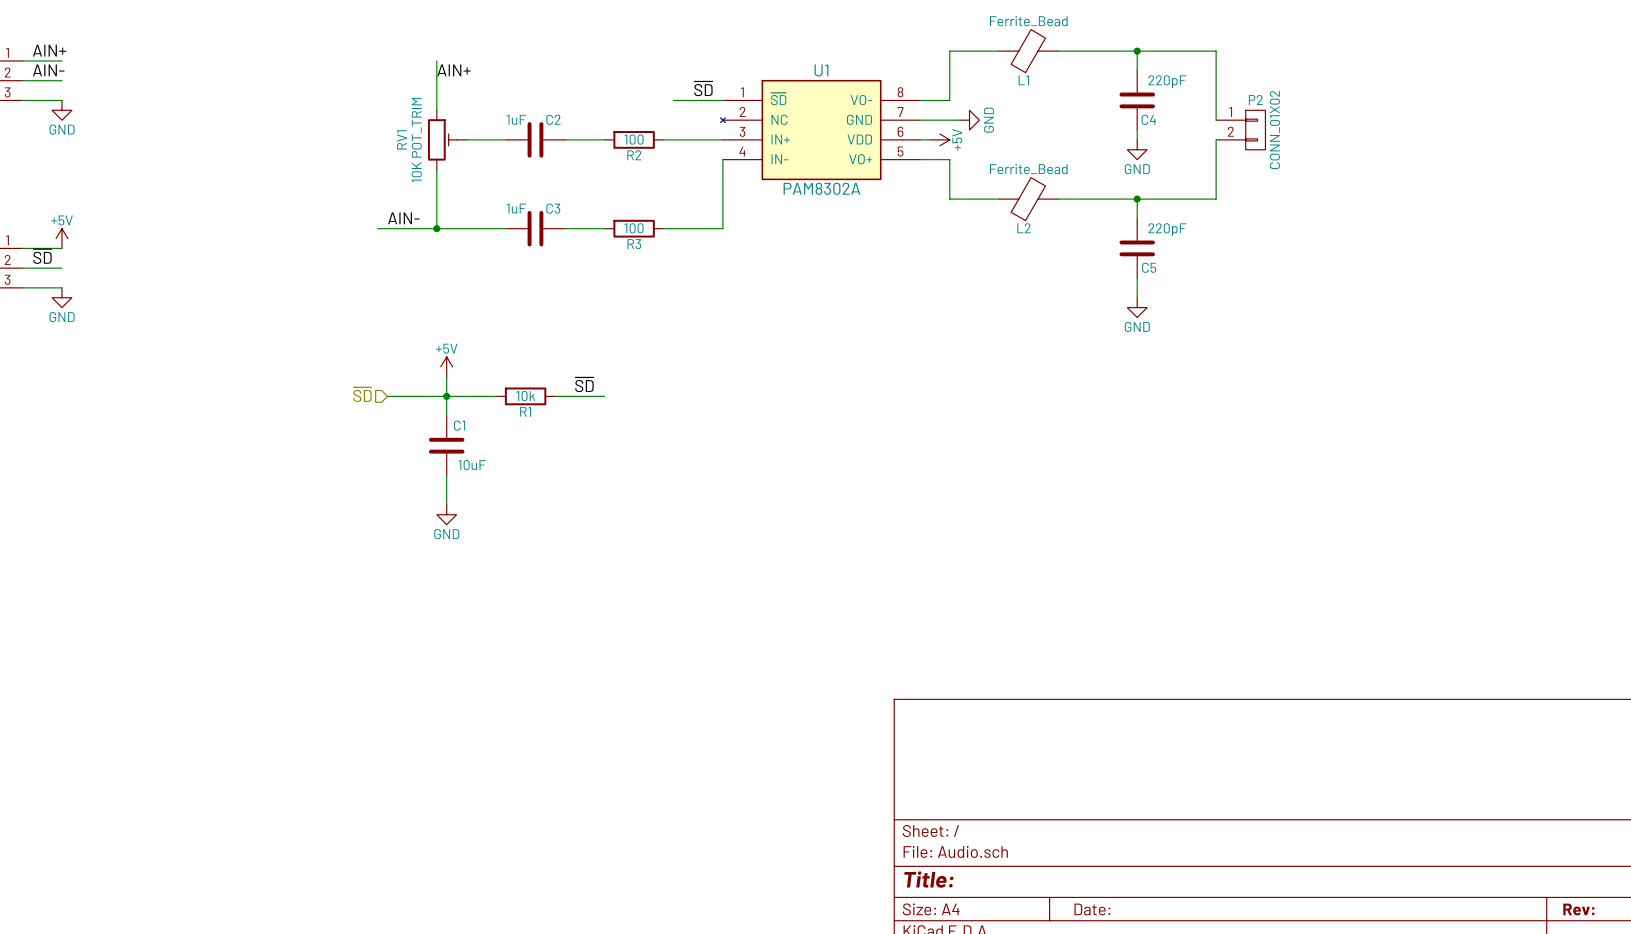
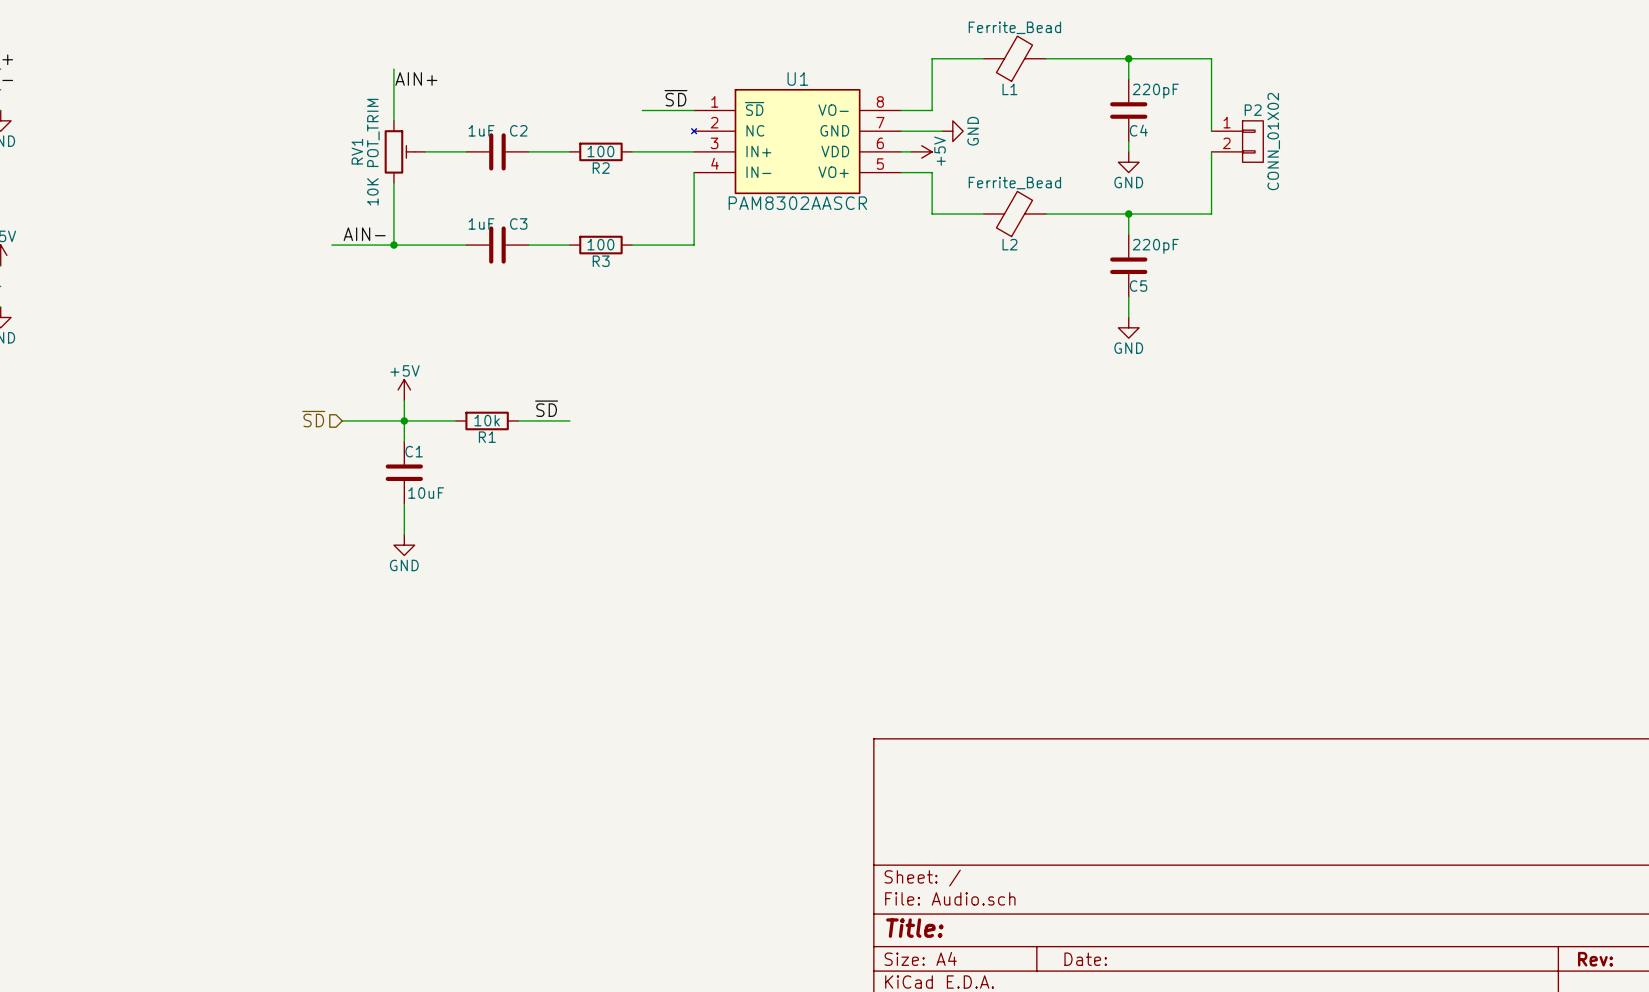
U1 value: PAM8302A (821, 188) -> PAM8302AASCR (797, 203)

